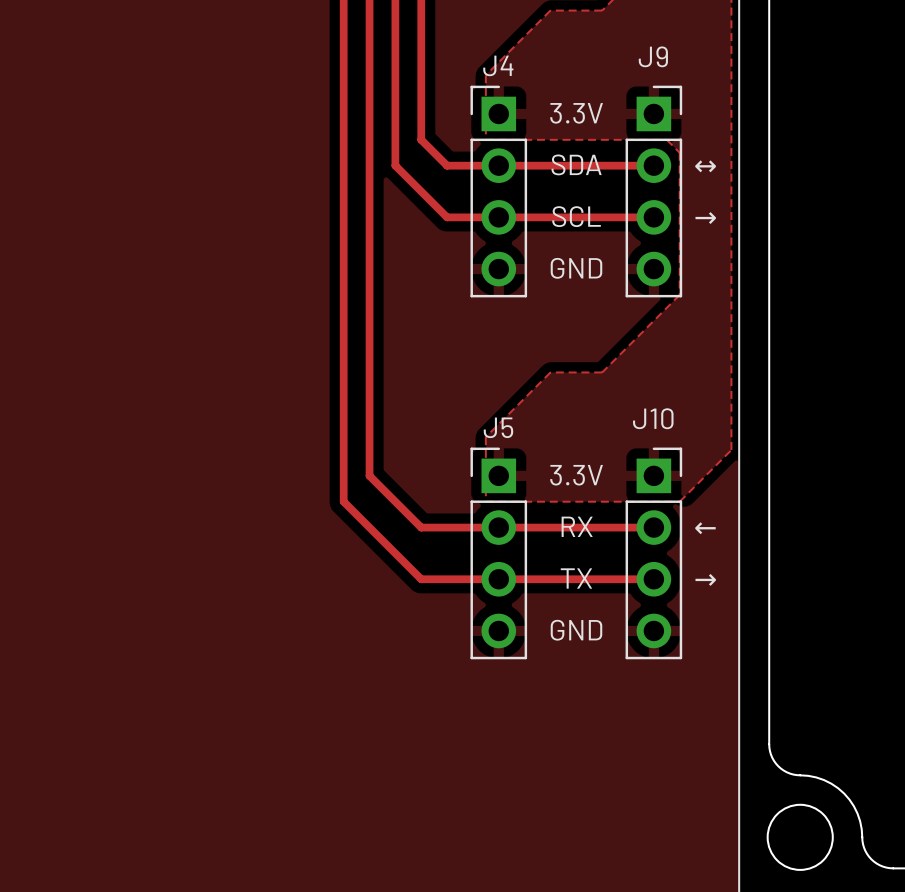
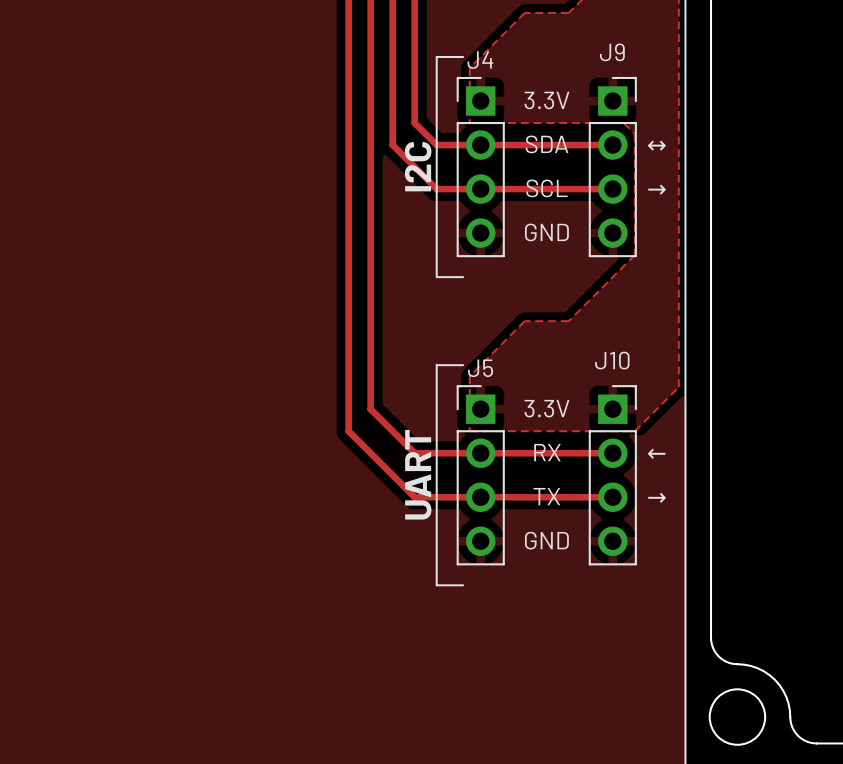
line: none -> (463, 56) (436, 56) (436, 277) (463, 277)
text: none -> I2C (418, 166)
line: none -> (463, 365) (436, 365) (436, 585) (463, 585)
text: none -> UART (418, 474)

